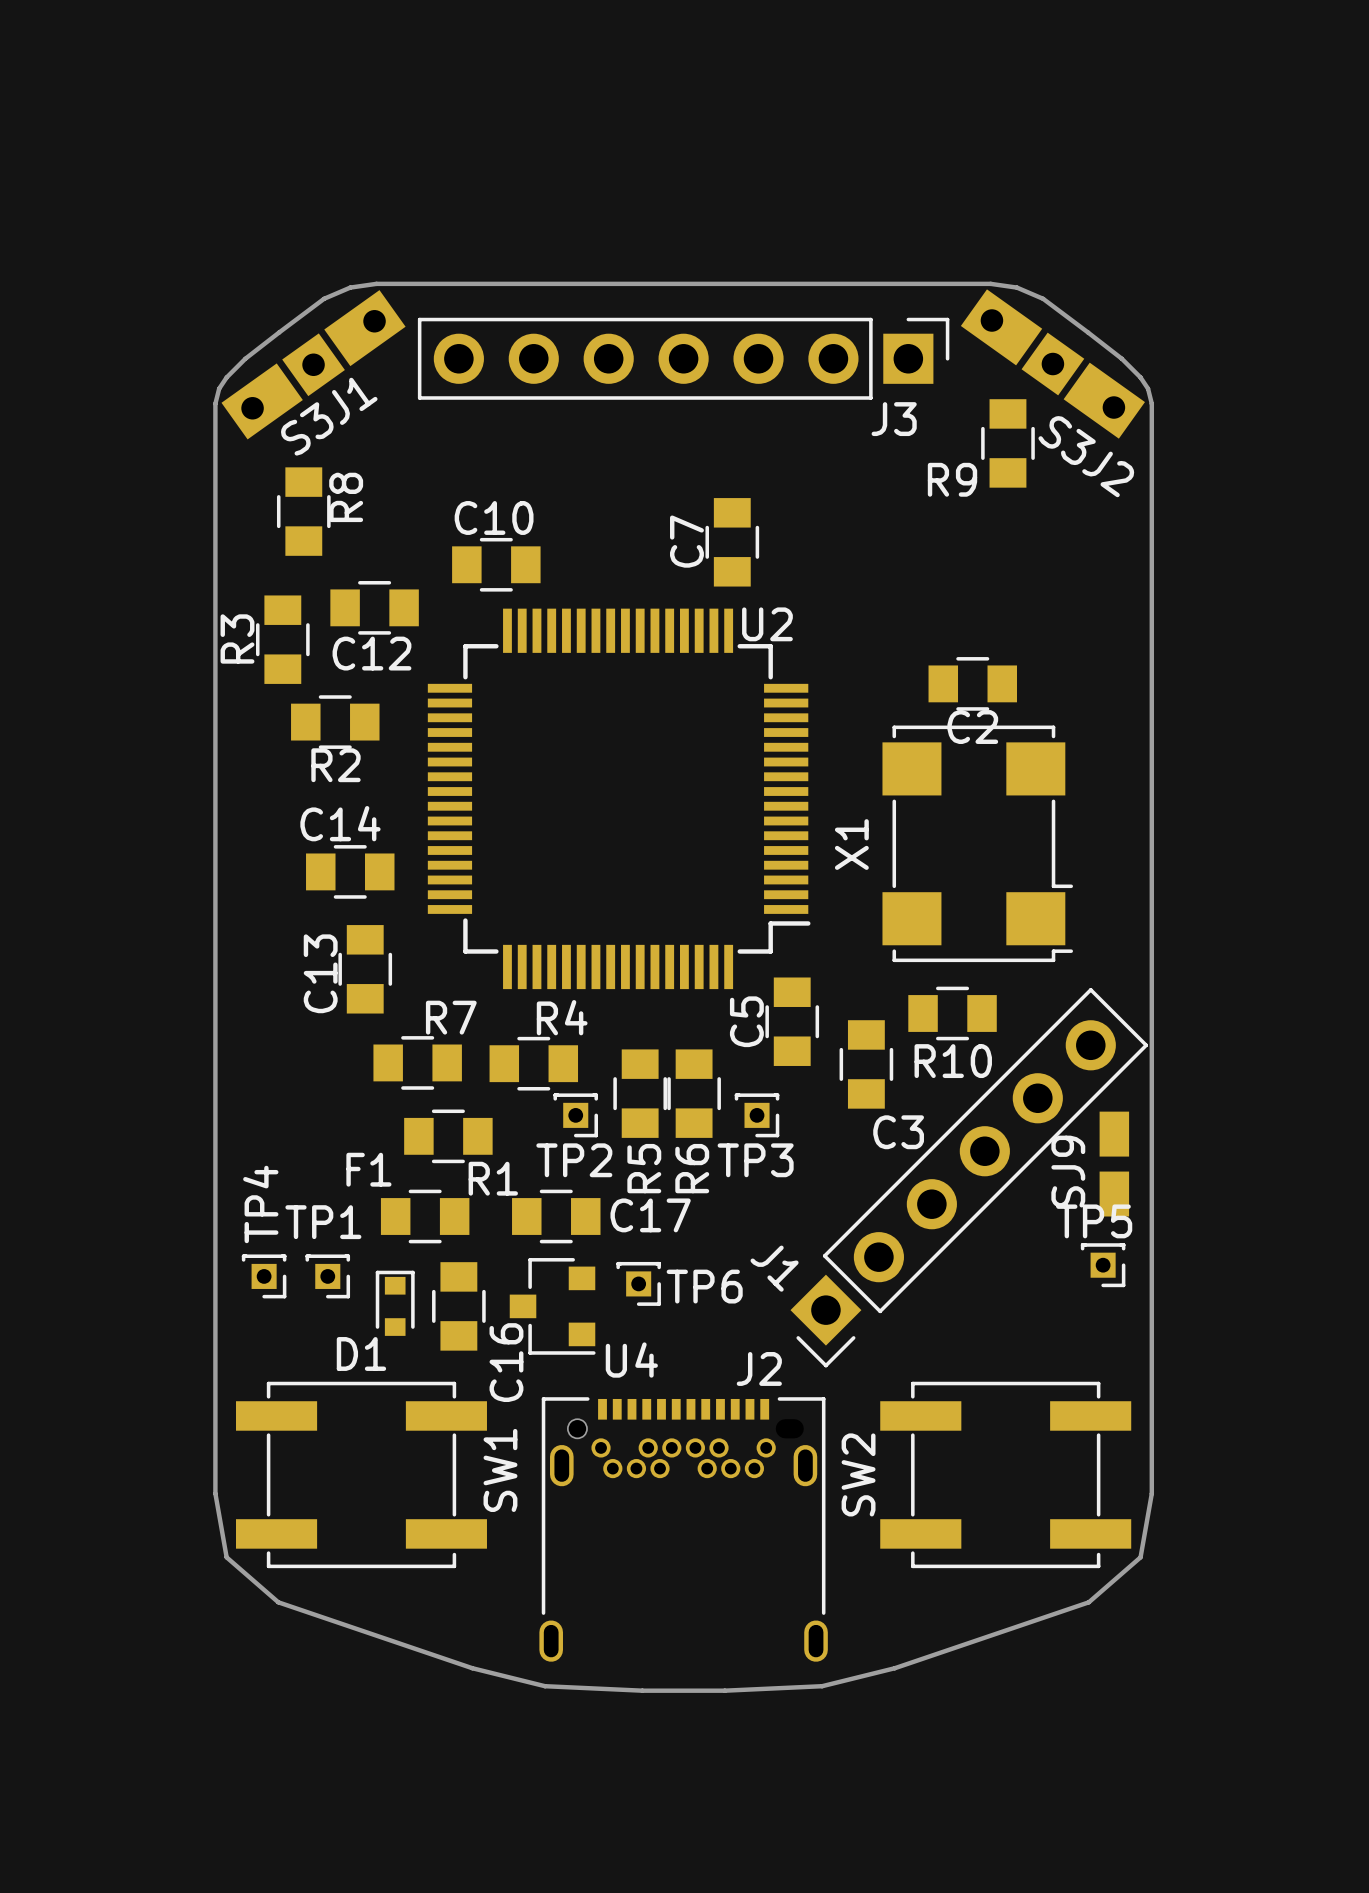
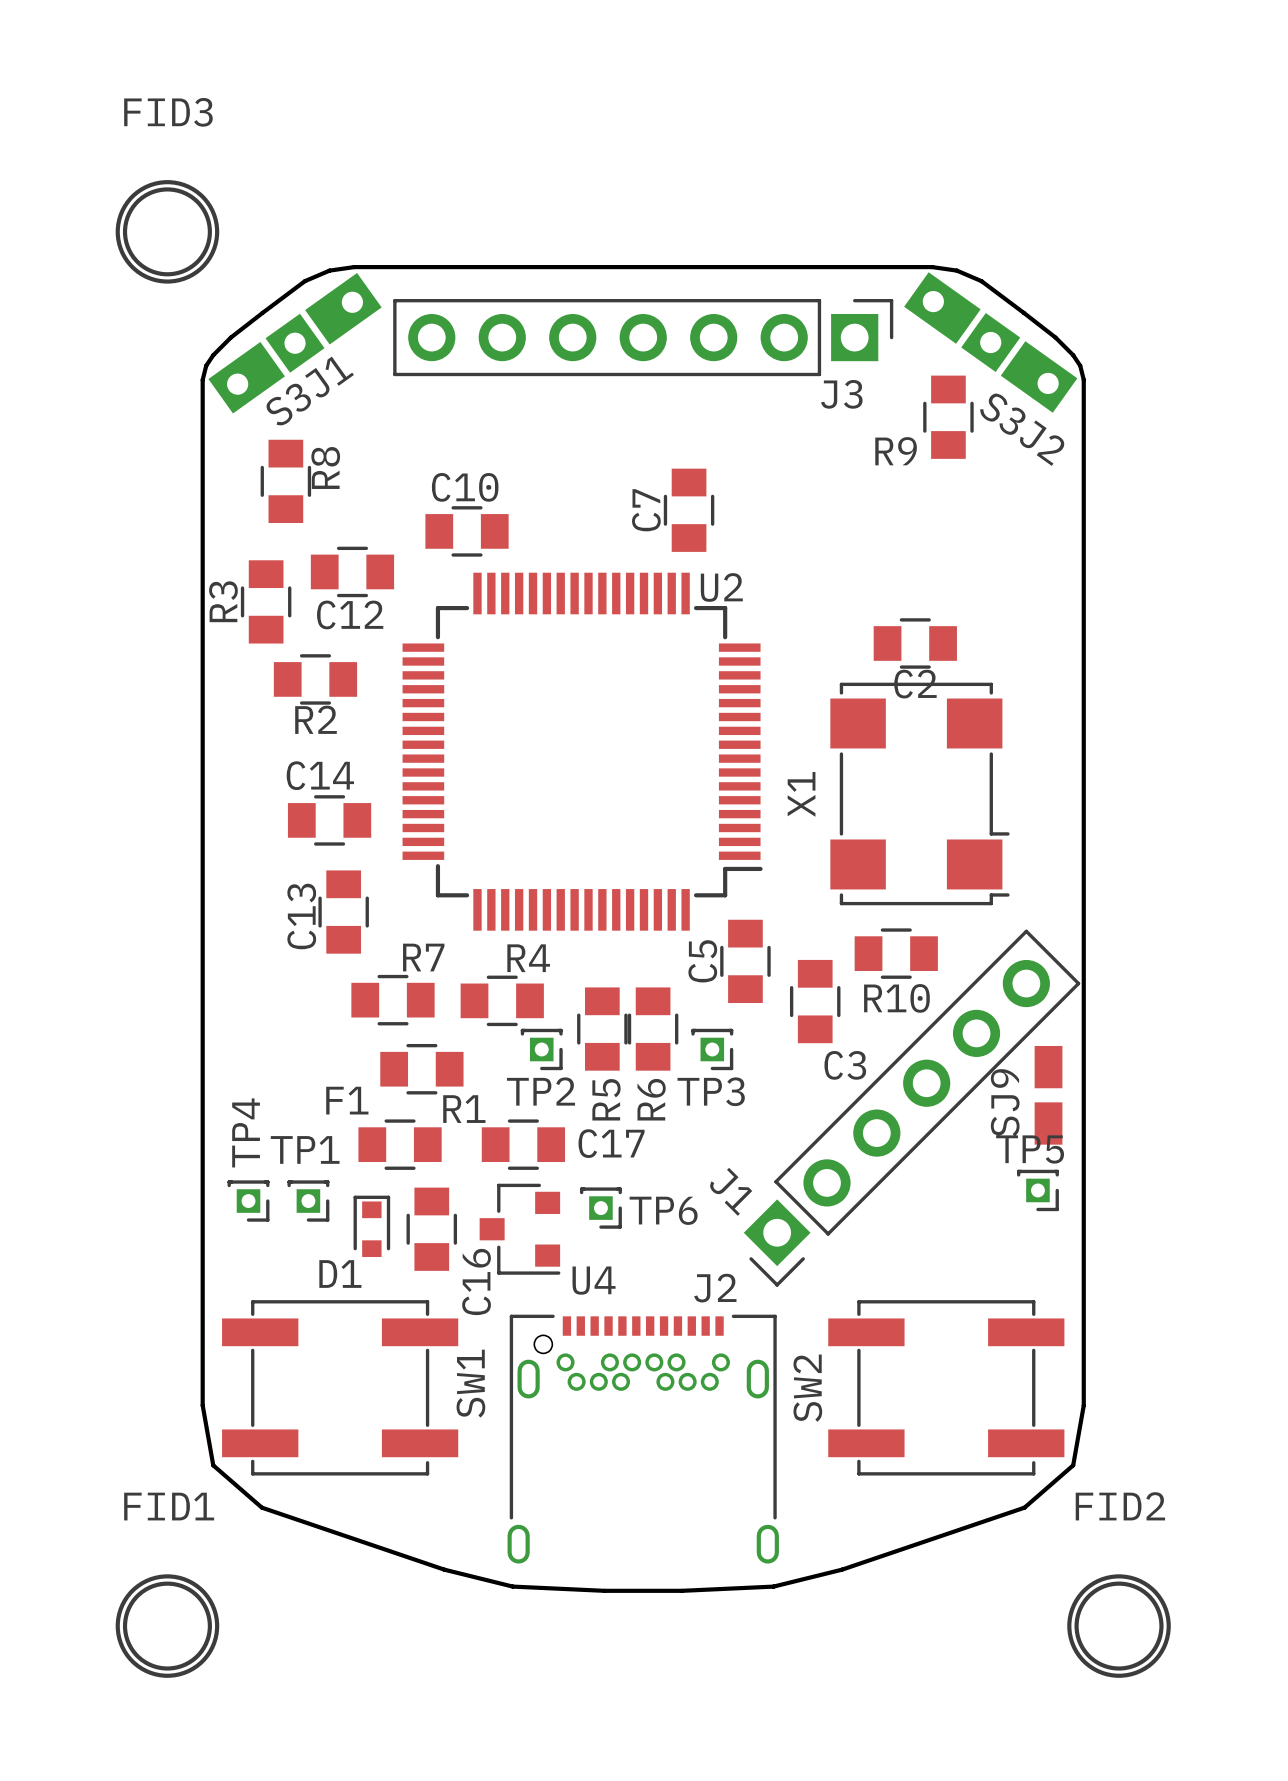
FID3: none -> (167, 231)
FID1: none -> (167, 1626)
FID2: none -> (1119, 1626)

